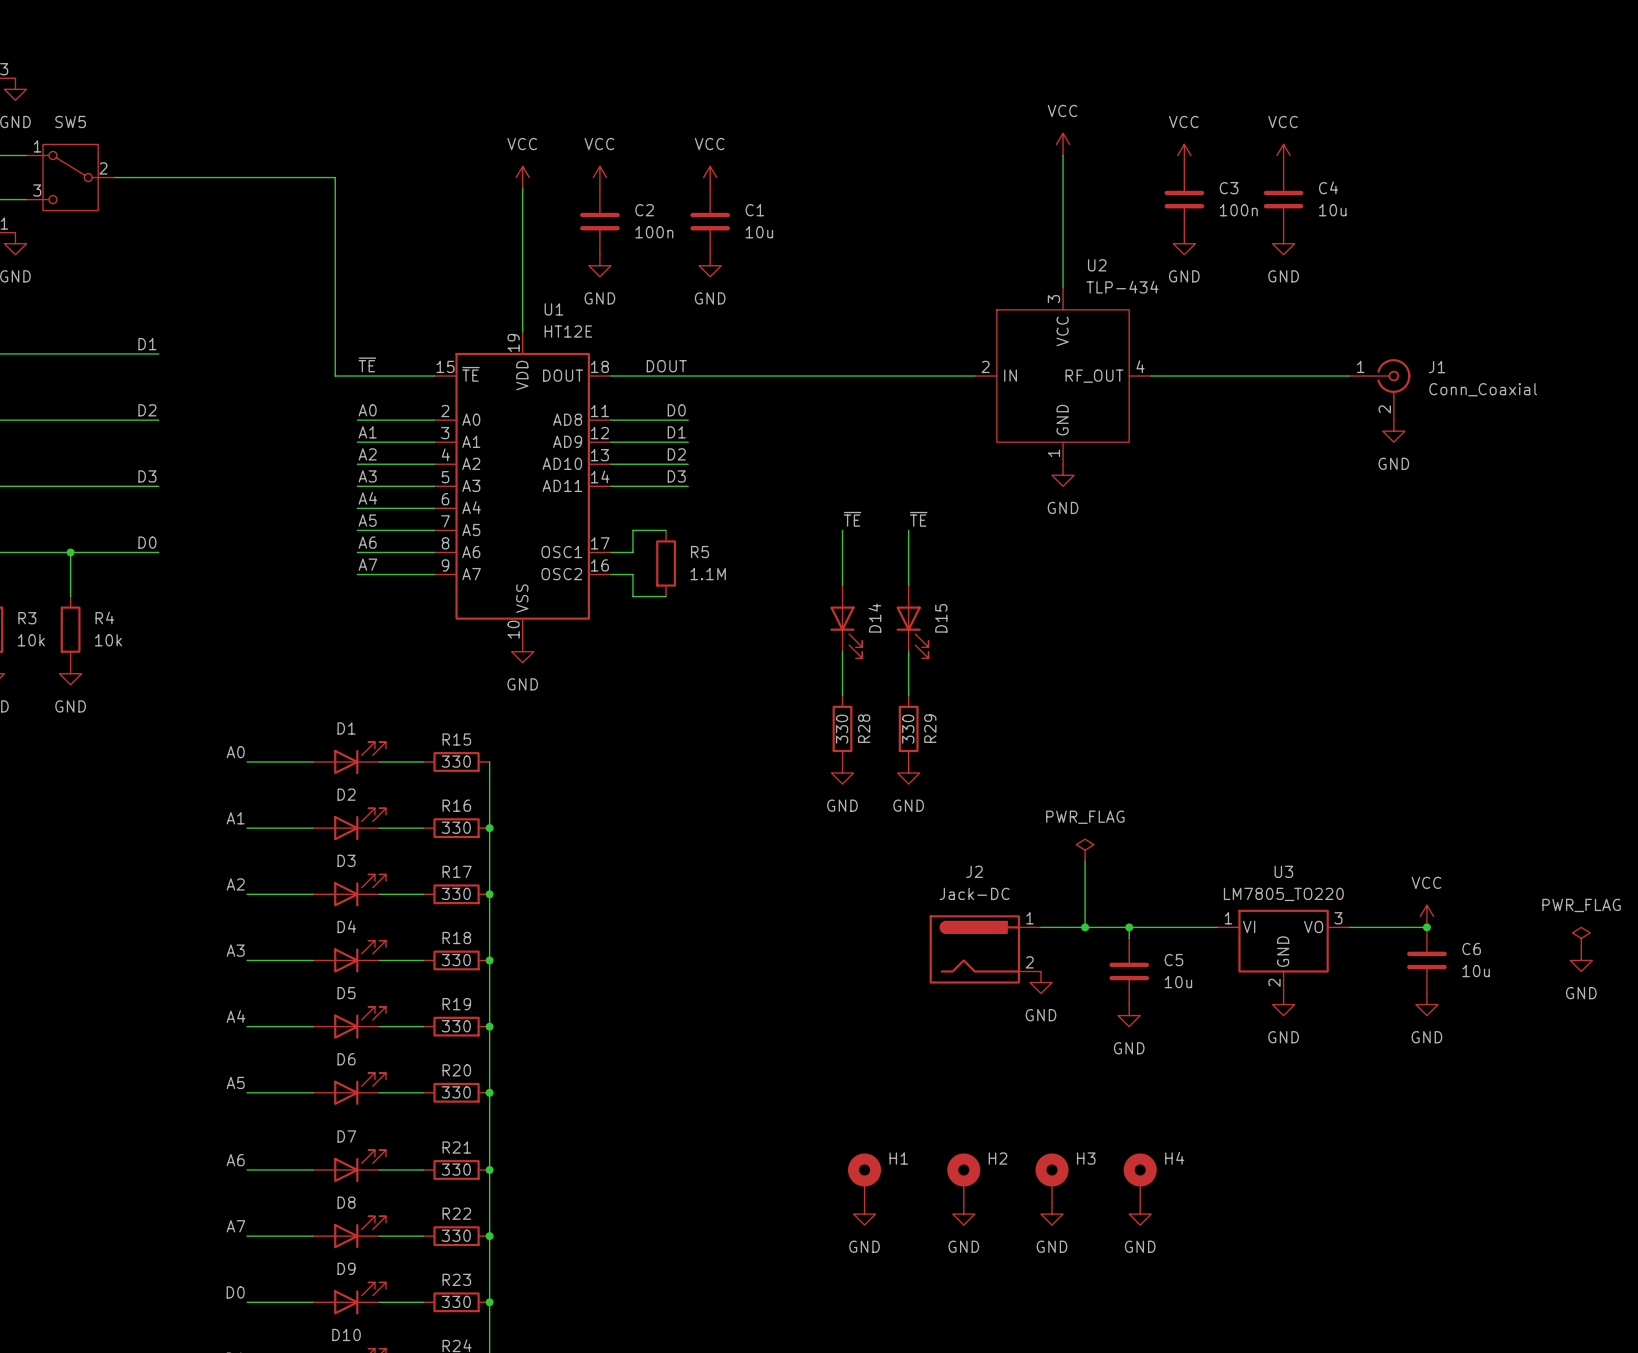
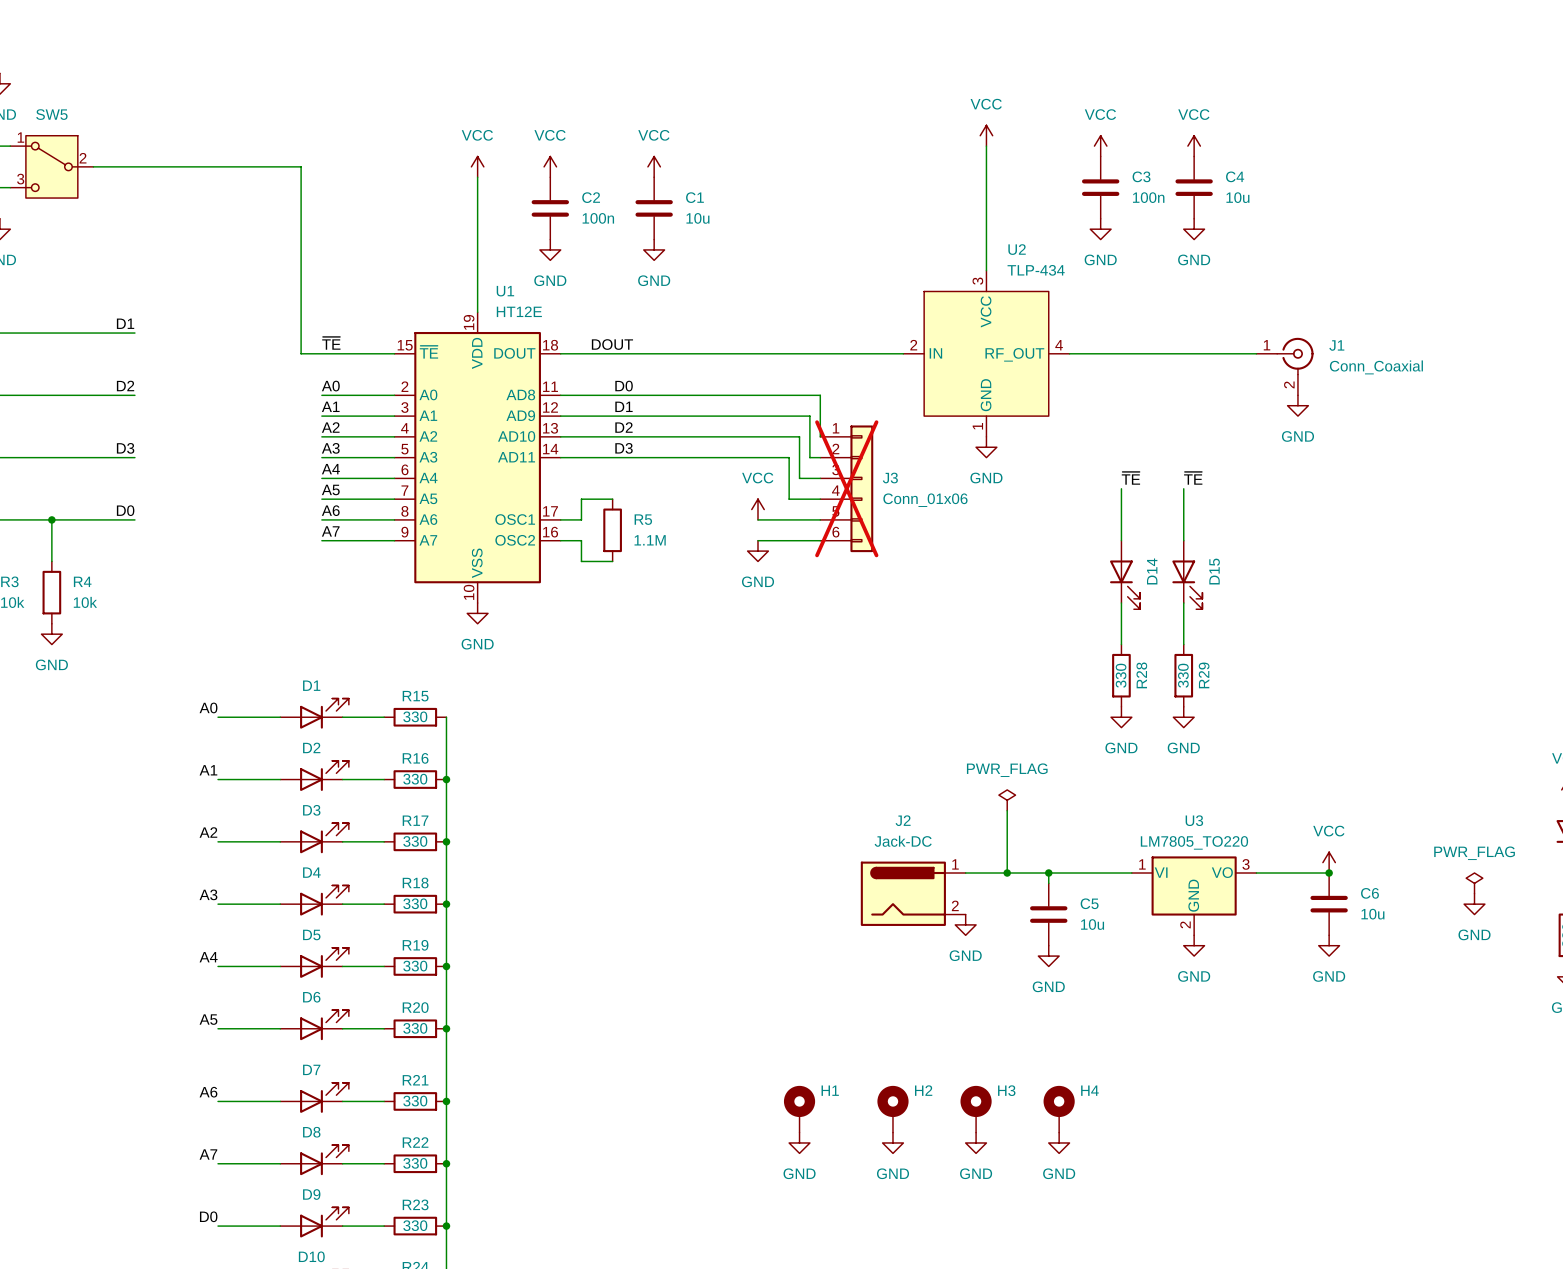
wire: none -> (633, 395) (820, 395) (820, 436)
wire: none -> (633, 416) (809, 416) (809, 457) (820, 457)
wire: none -> (633, 436) (799, 436) (799, 478) (820, 478)
wire: none -> (633, 457) (789, 457) (789, 499) (820, 499)
label: none -> ~{TE} (1130, 478)
label: none -> ~{TE} (1193, 478)
label: ~{TE} (852, 519) -> none
J3: none -> Conn_01x06 (846, 488)
label: ~{TE} (918, 519) -> none
wire: none -> (1121, 488) (1121, 540)
wire: none -> (1183, 488) (1183, 540)
wire: (842, 530) (842, 585) -> none
wire: (908, 530) (908, 585) -> none
power symbol: none -> VCC (757, 509)
wire: none -> (757, 519) (820, 519)
wire: none -> (757, 540) (820, 540)
power symbol: none -> GND (757, 551)
D14 position: (846, 621) -> (1125, 574)
D15 position: (912, 621) -> (1187, 574)
wire: none -> (1121, 603) (1121, 644)
wire: none -> (1183, 603) (1183, 644)
wire: (842, 651) (842, 695) -> none
wire: (908, 651) (908, 695) -> none
R28 position: (842, 728) -> (1121, 675)
R29 position: (908, 728) -> (1183, 675)
power symbol: none -> GND (1121, 717)
power symbol: none -> GND (1183, 717)
power symbol: GND (842, 773) -> none
power symbol: GND (908, 773) -> none

